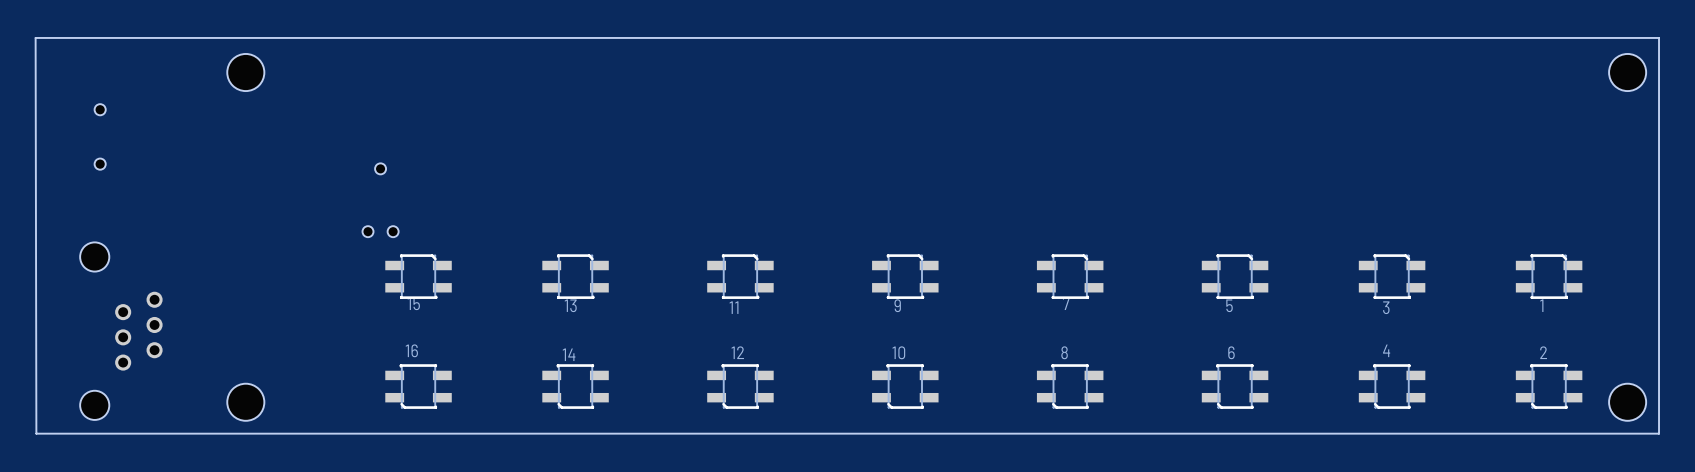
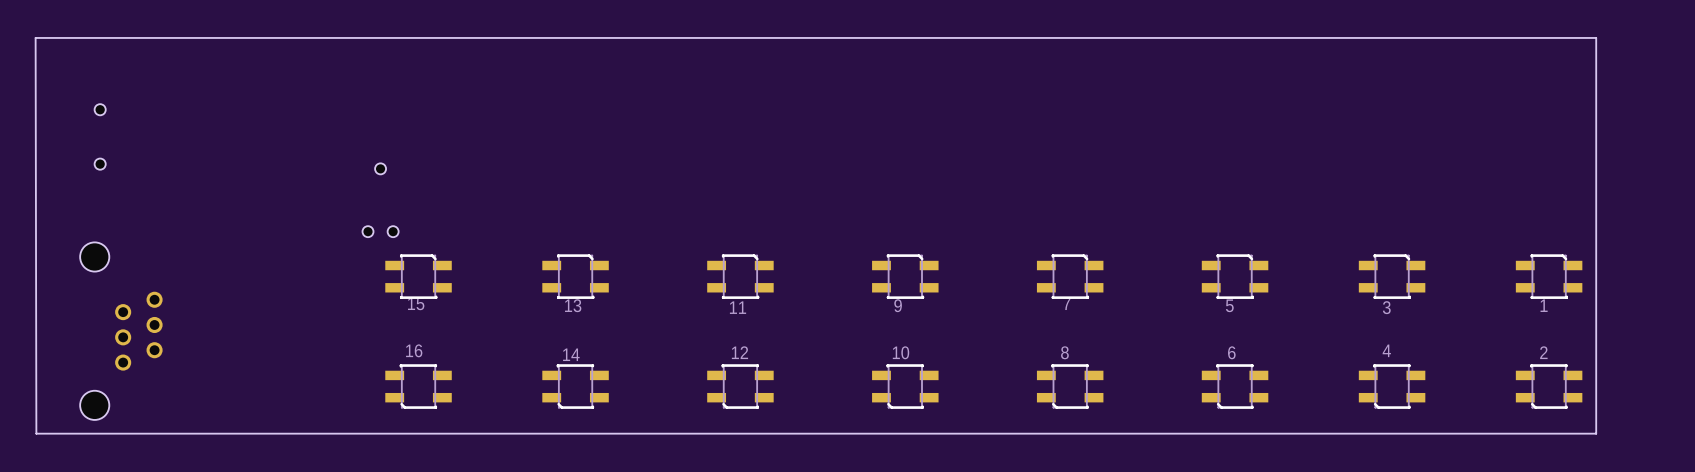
board edge: (1596, 37) (1659, 37) (1659, 433) (1596, 433) -> (1596, 37) (1596, 433)
hole: (245, 72) -> none
hole: (1627, 72) -> none
hole: (245, 402) -> none
hole: (1627, 402) -> none

